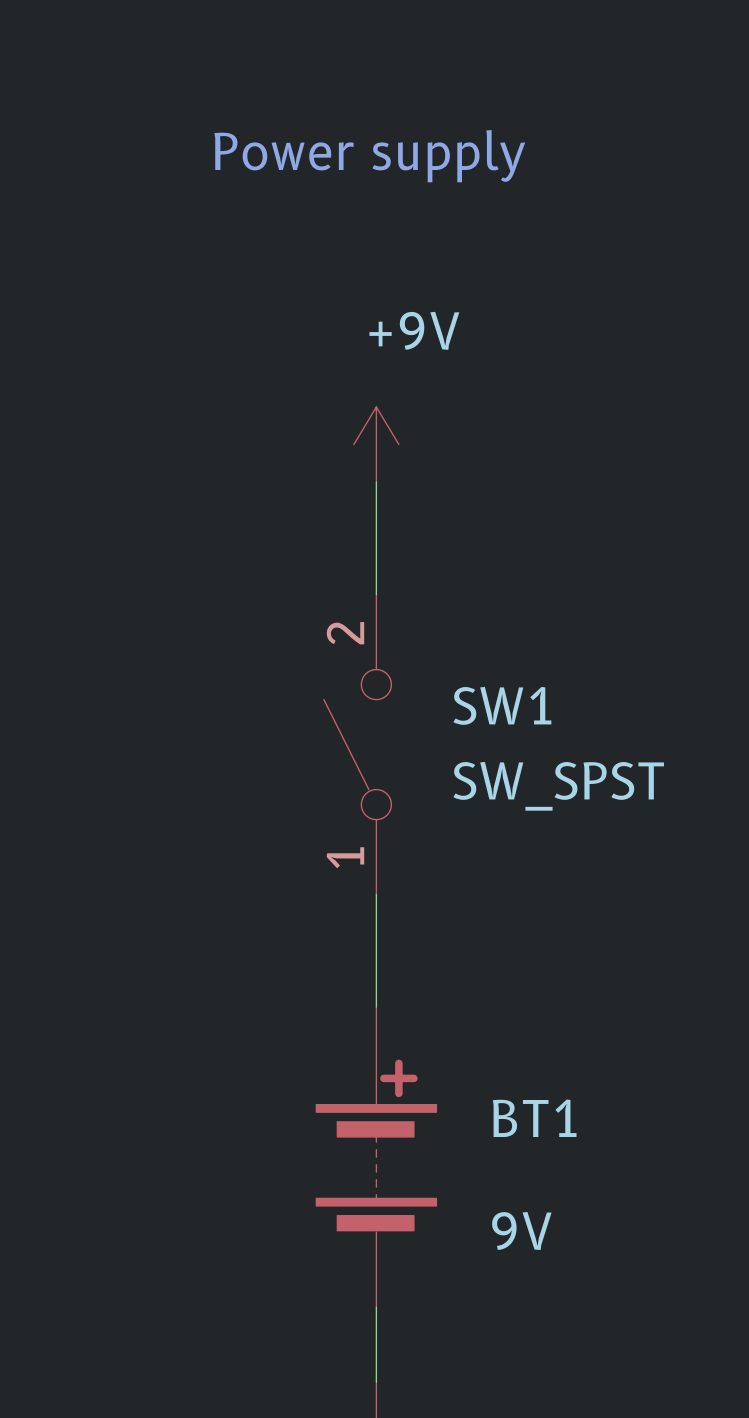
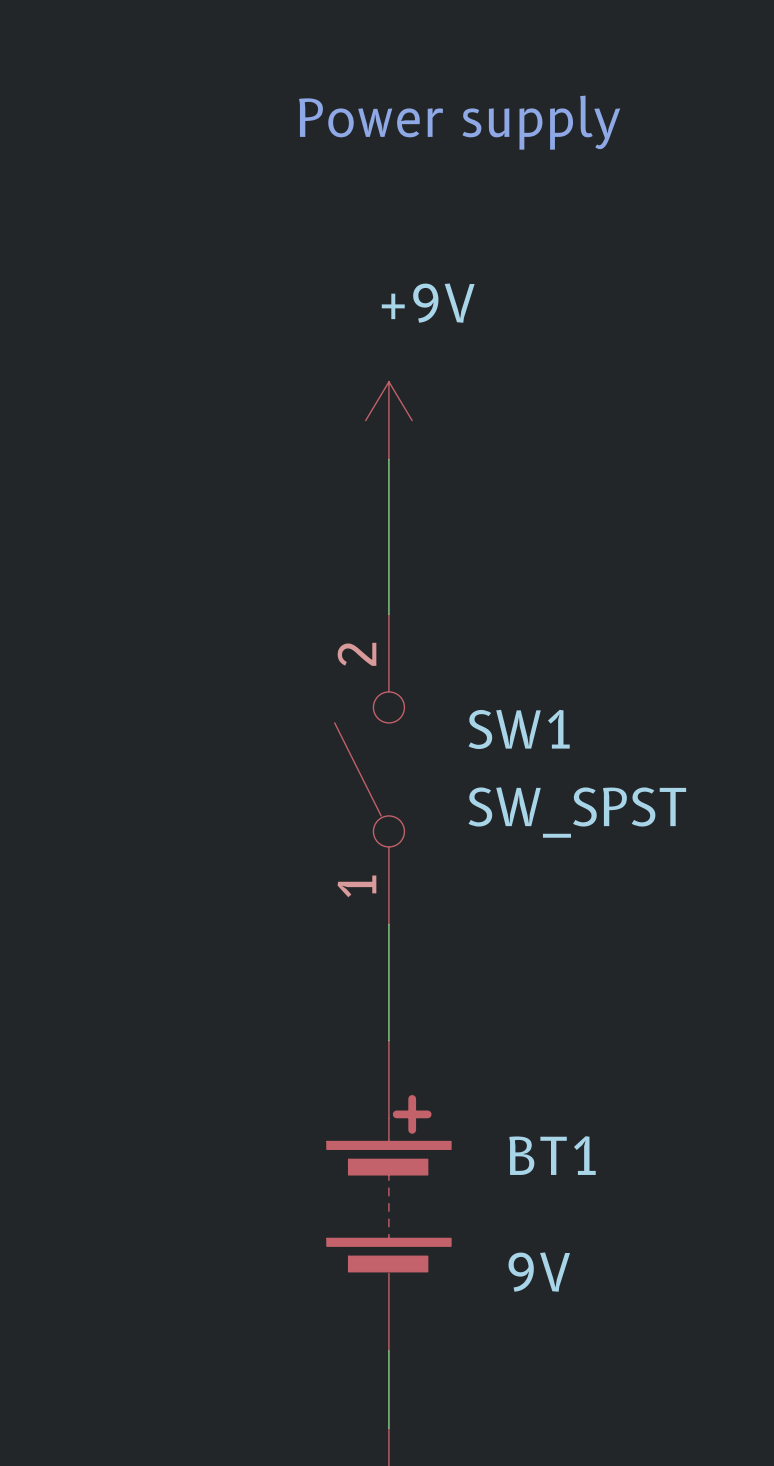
text position: Power supply (369, 156) -> Power supply (459, 122)
power symbol position: +9V (376, 444) -> +9V (388, 420)

